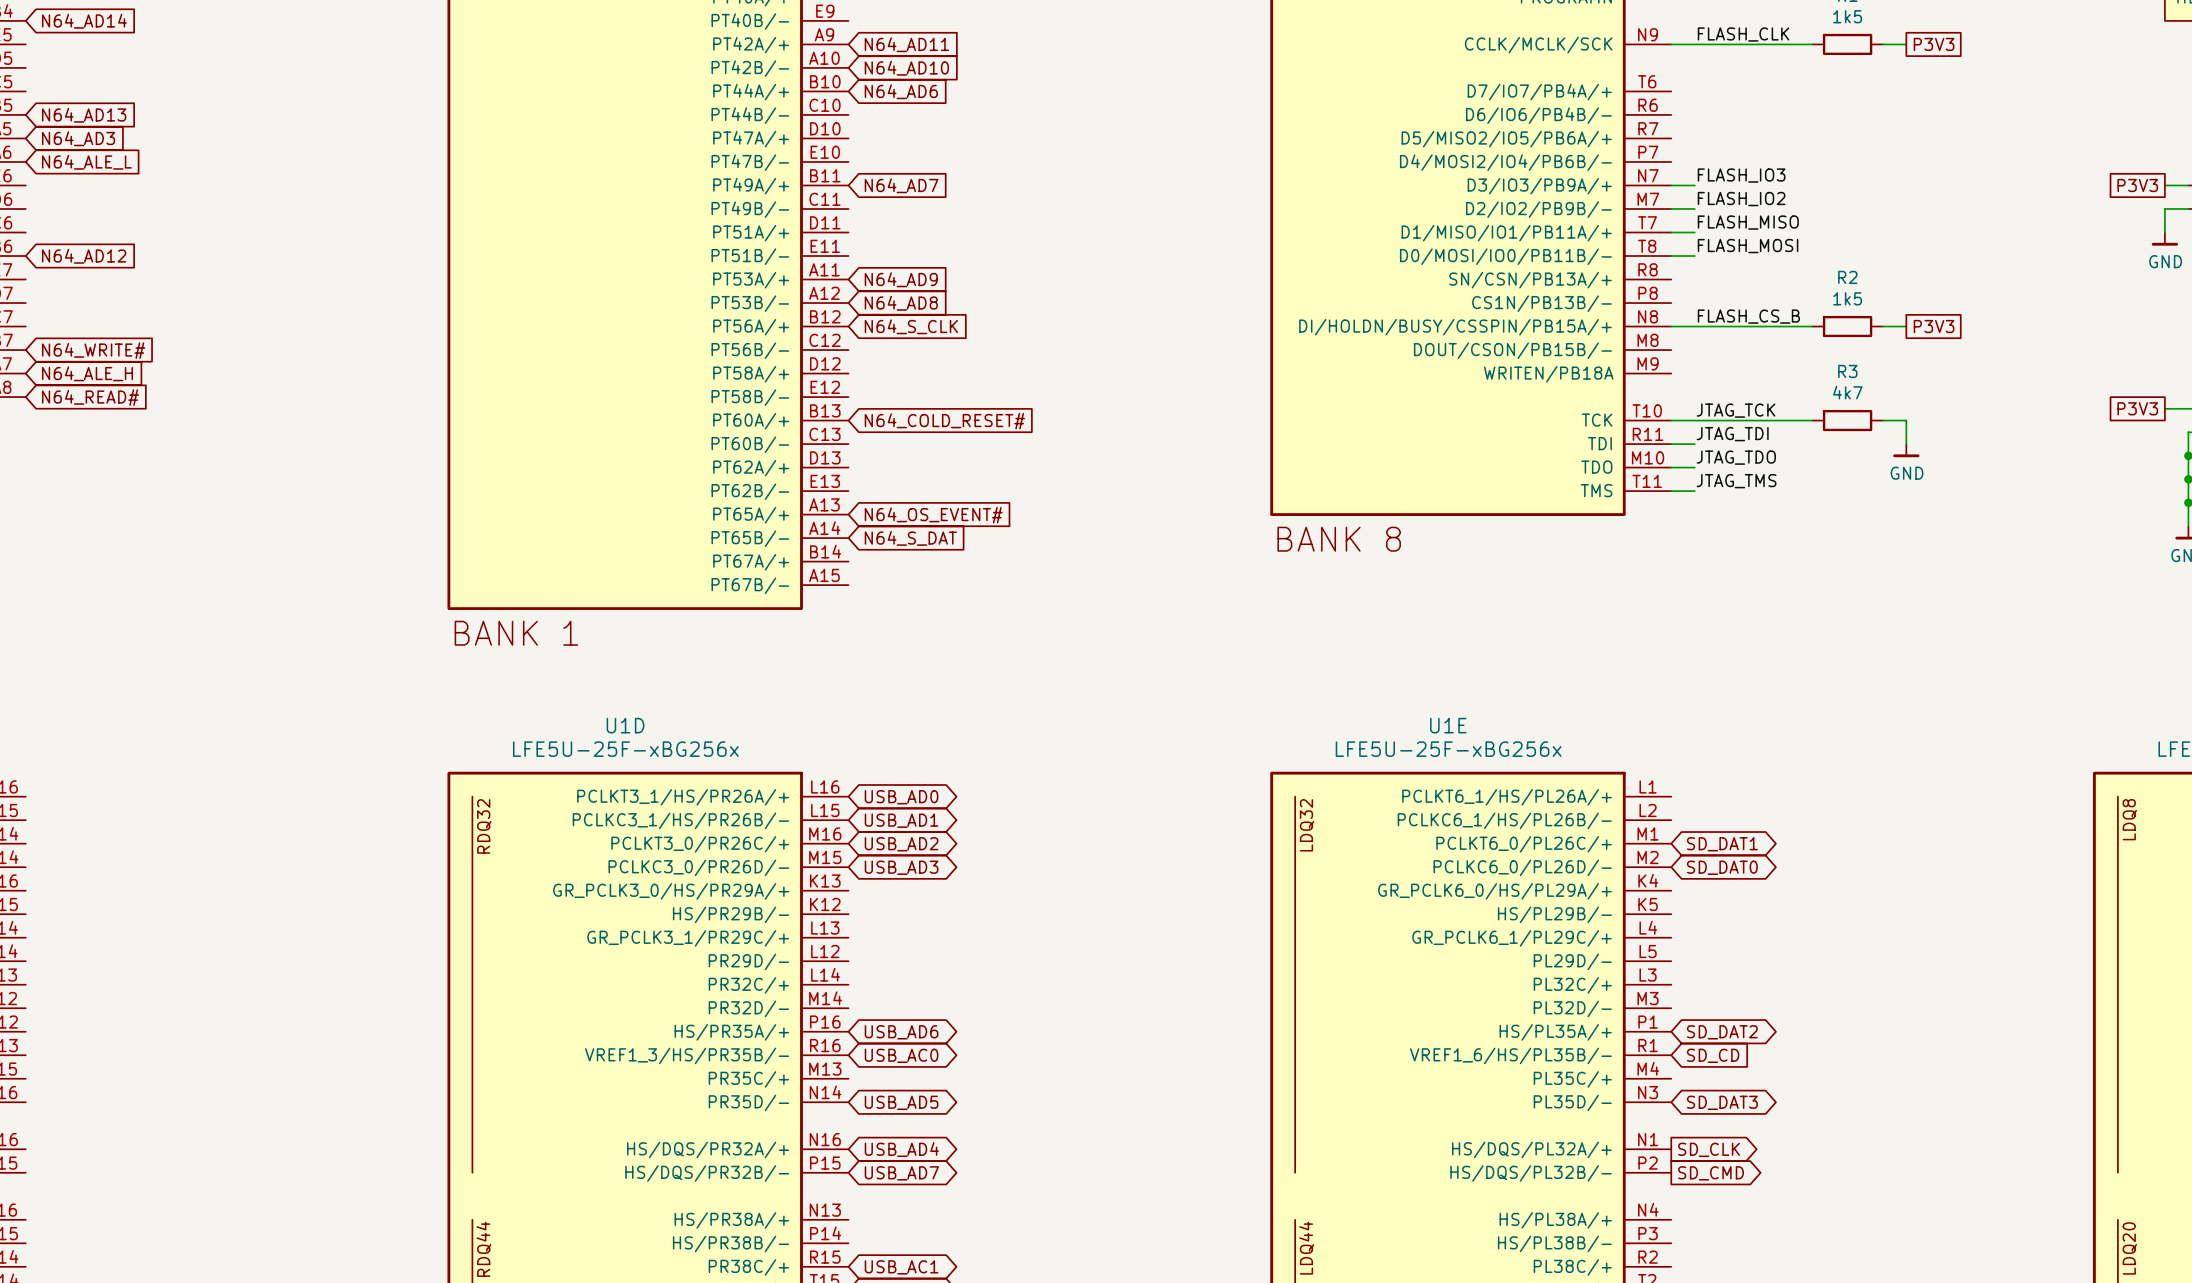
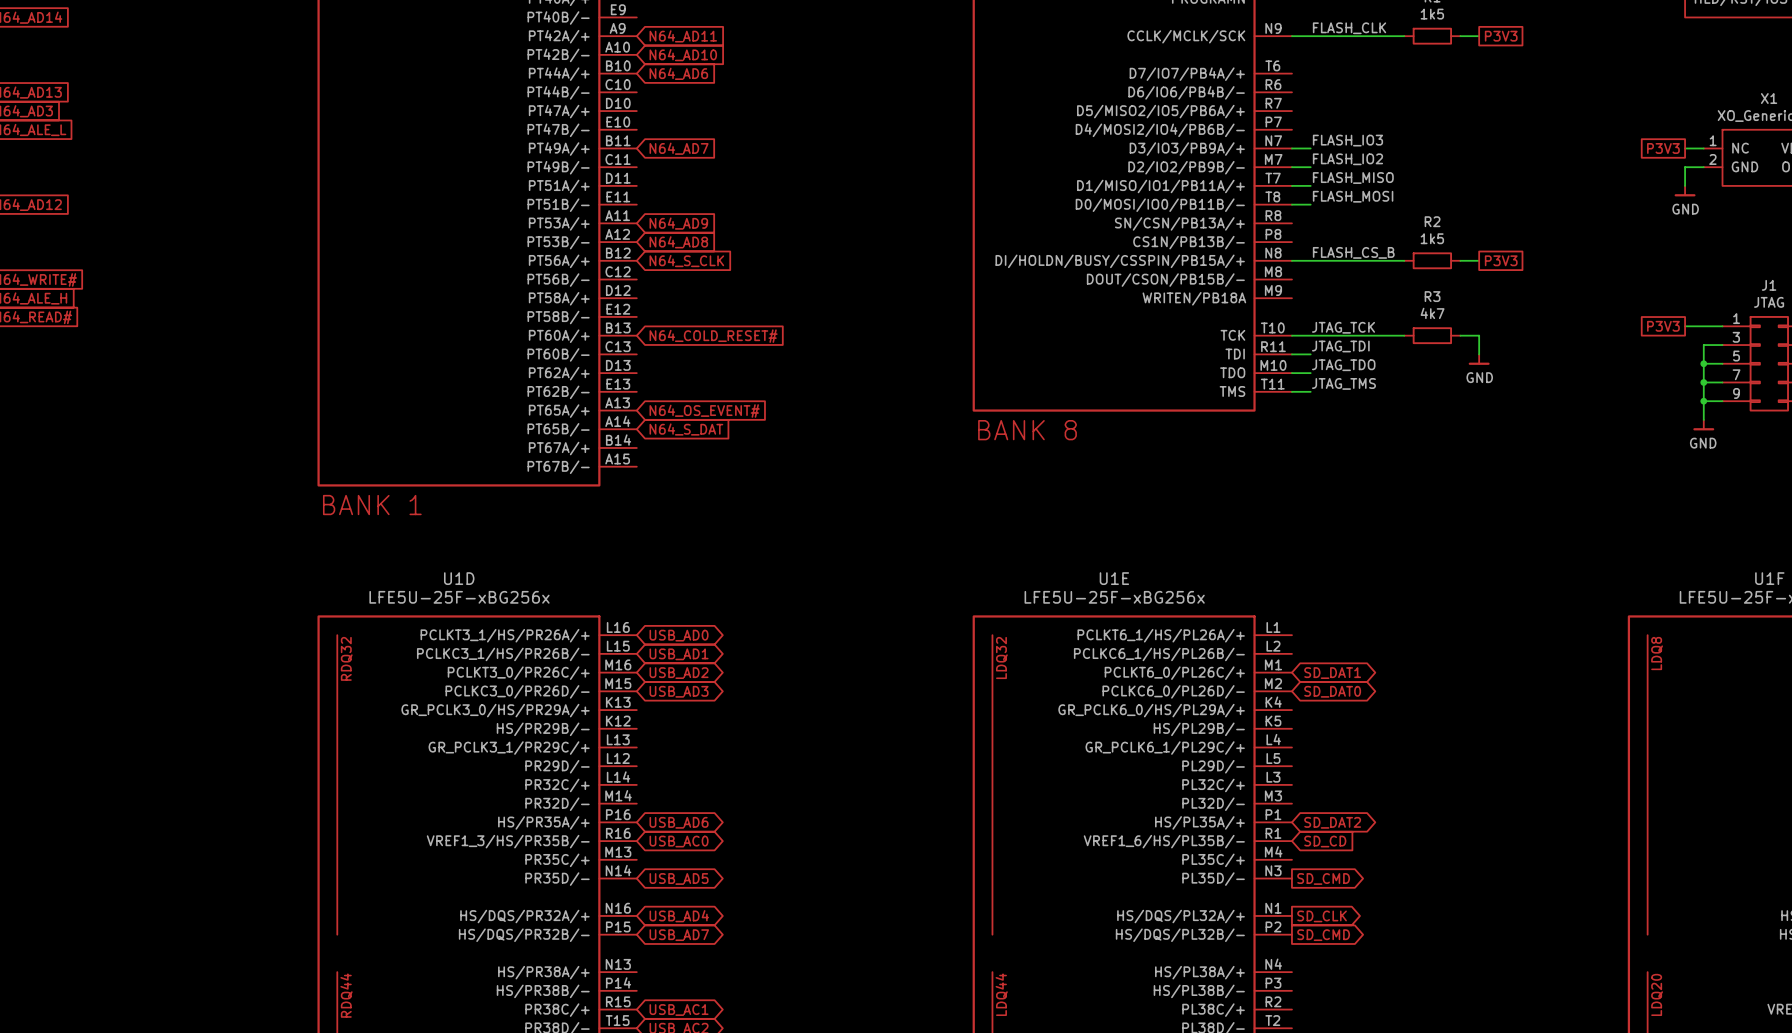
global label shape: bidirectional (1722, 1102) -> output (1323, 878)
global label: SD_DAT3 (1722, 1102) -> SD_CMD (1323, 878)

